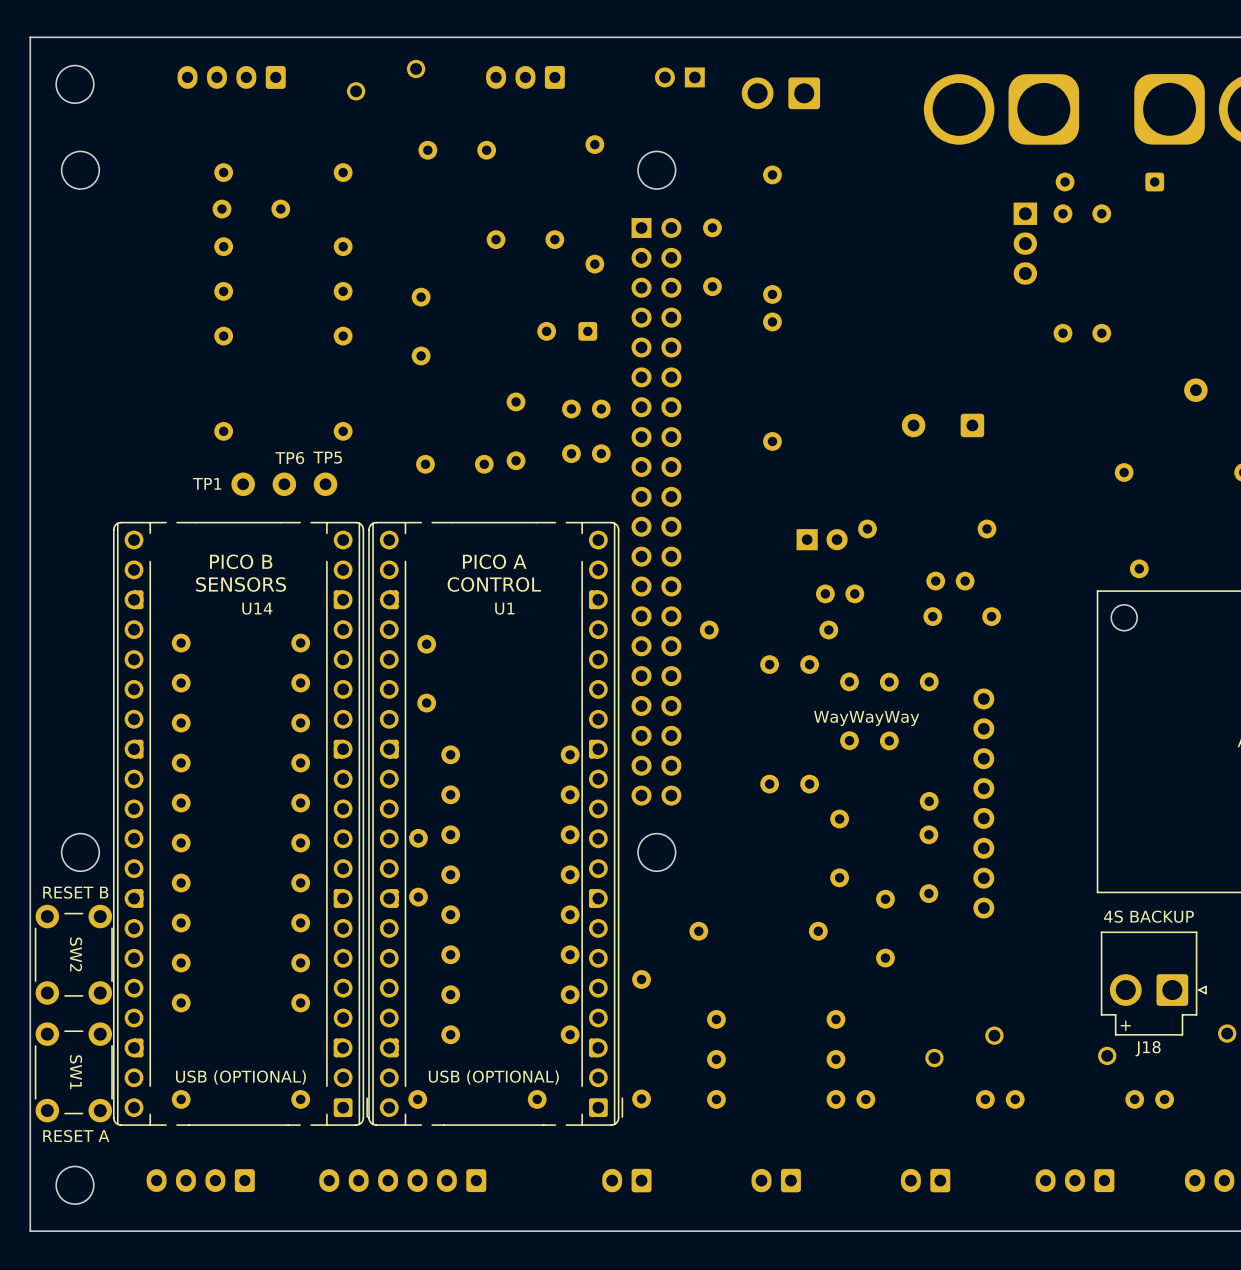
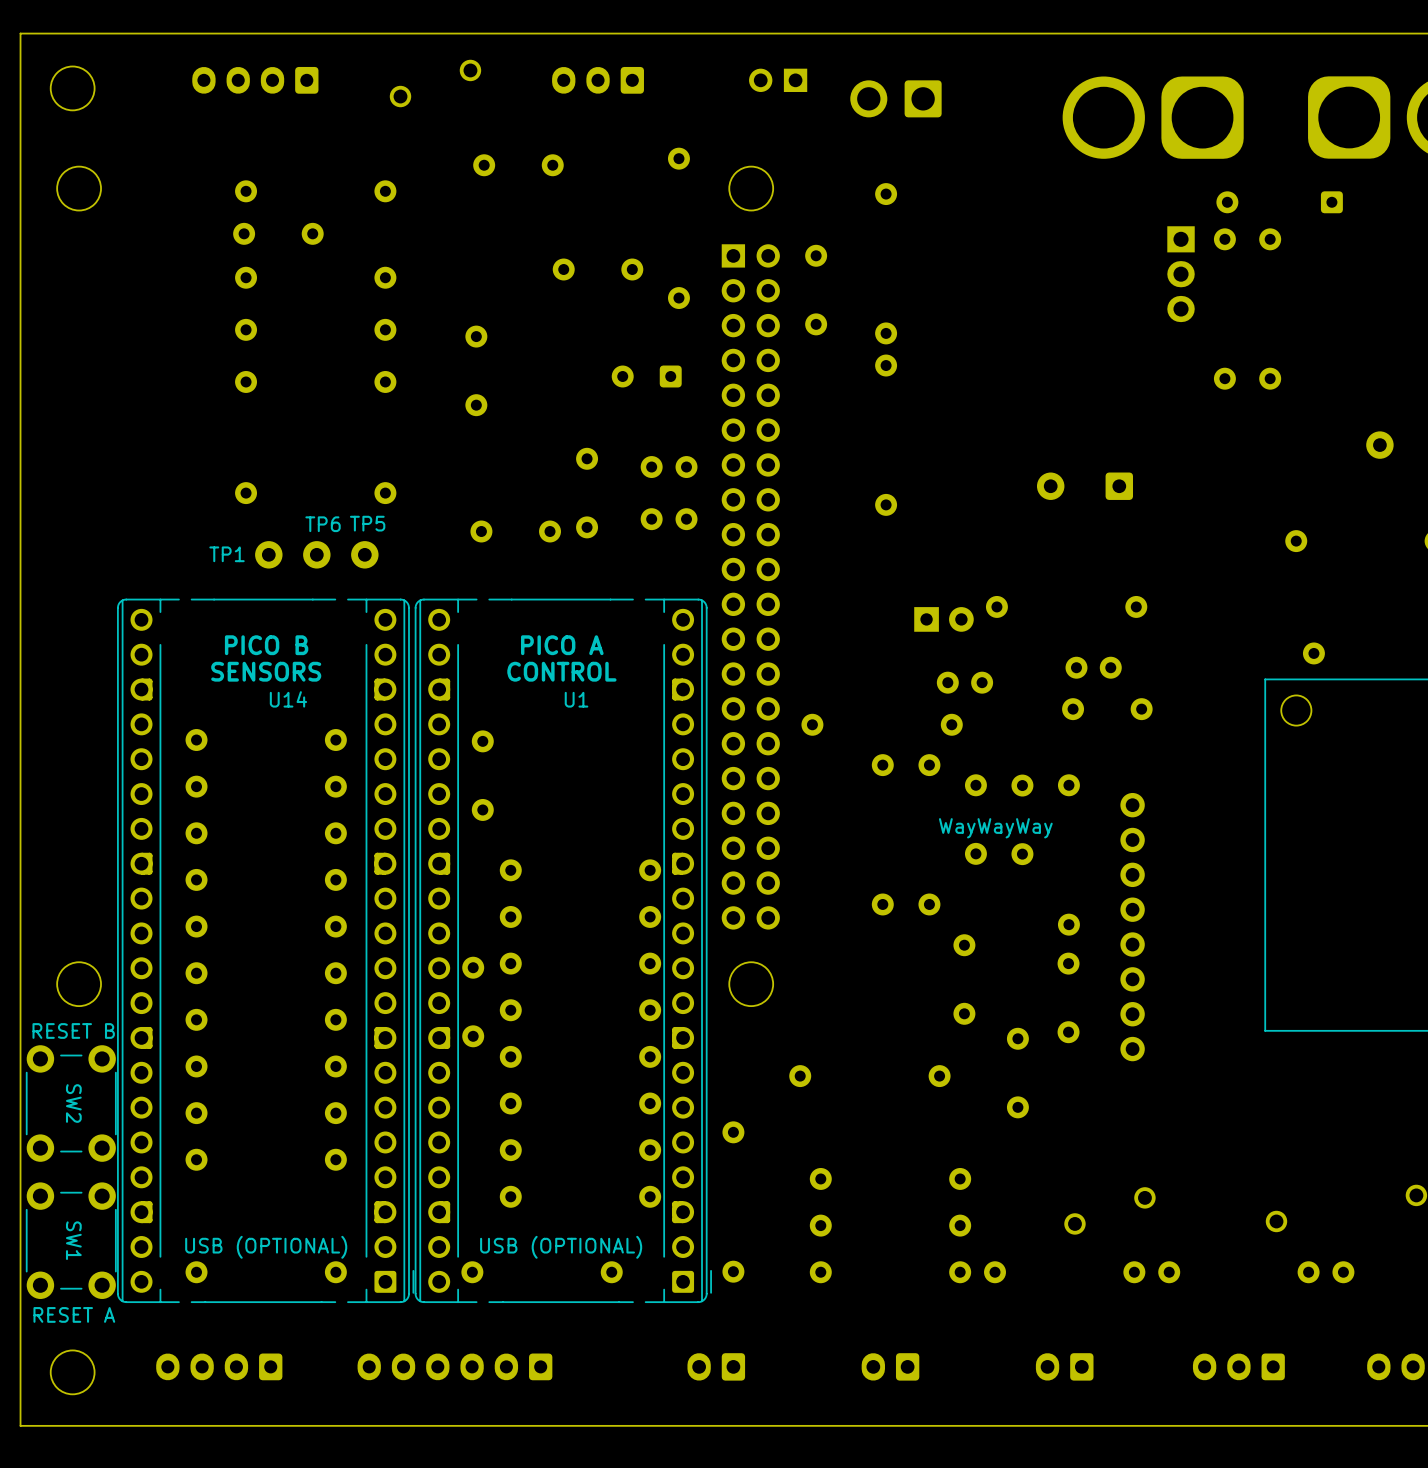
text: 4S BACKUP (1148, 916) -> none
J18: (1153, 983) -> none
text: + (1125, 1025) -> none

